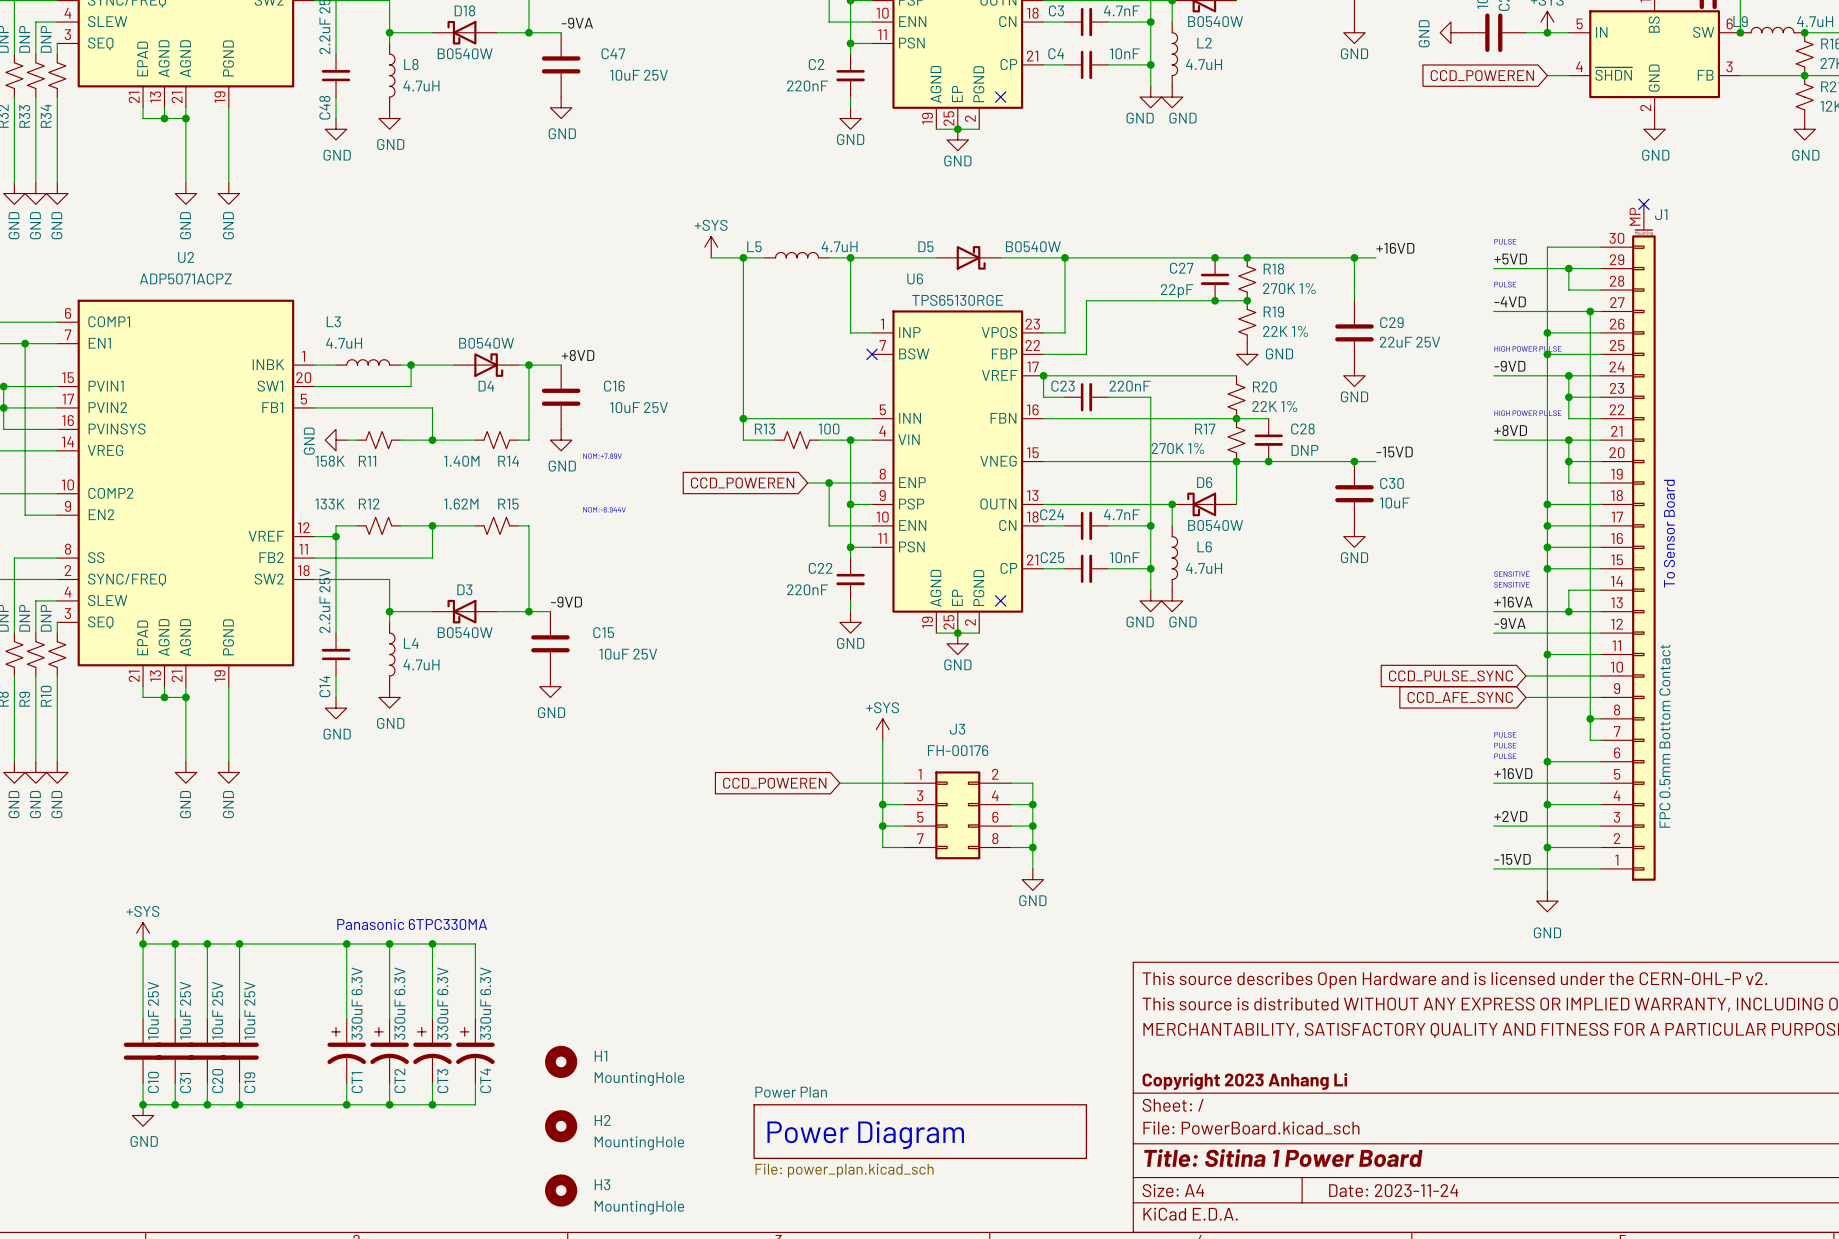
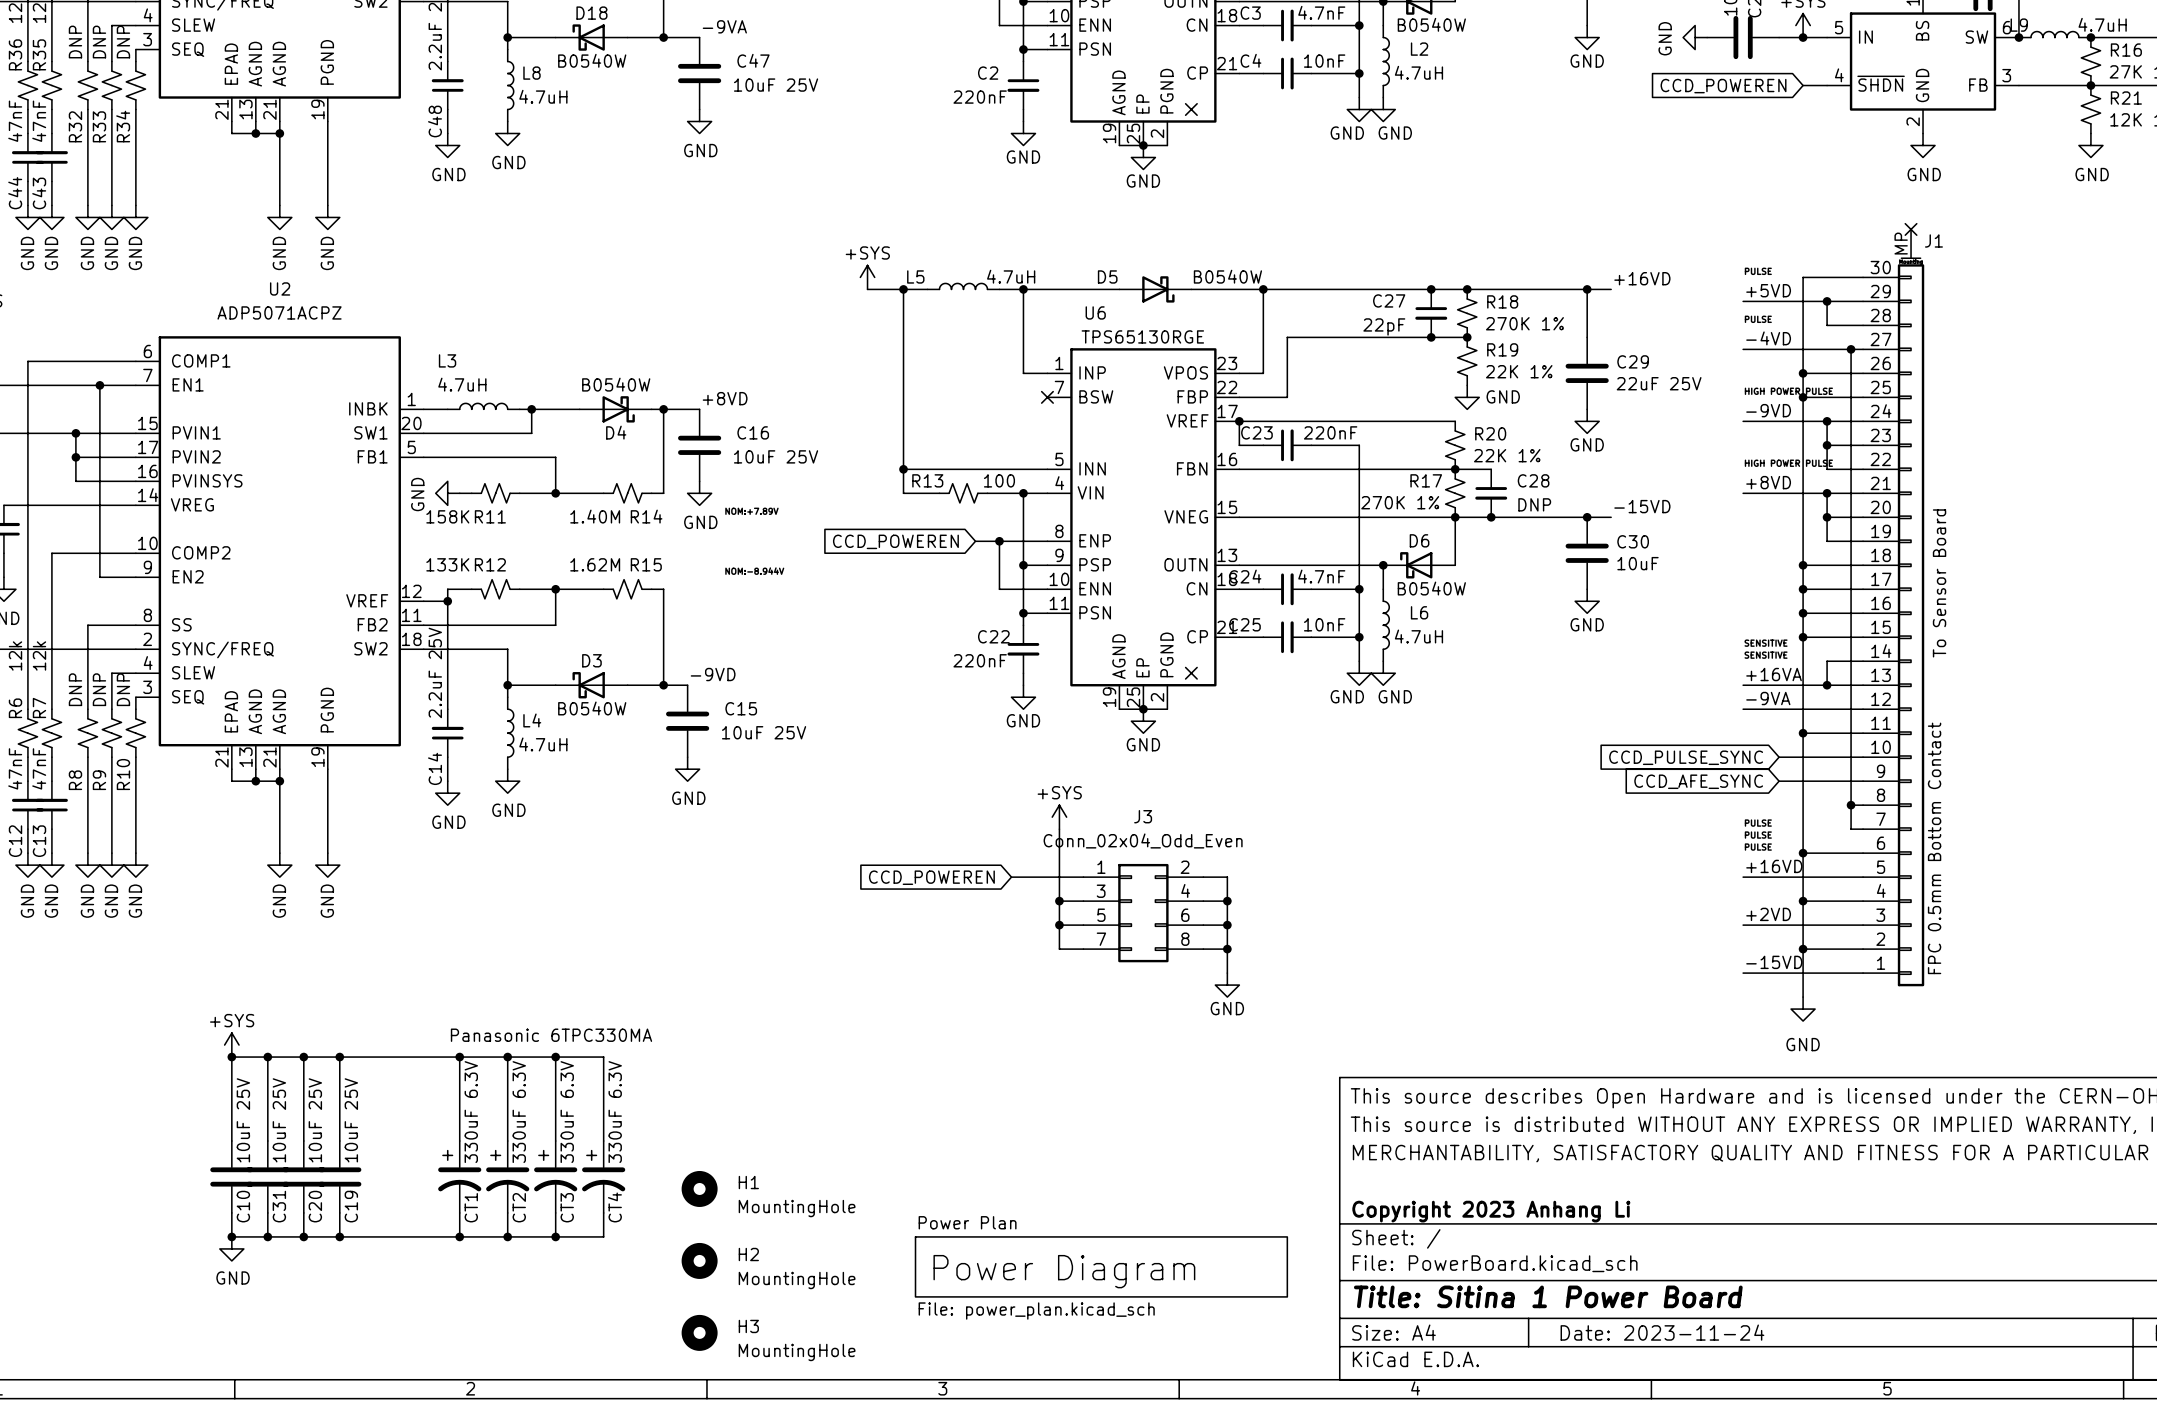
J3 value: FH-00176 (958, 750) -> Conn_02x04_Odd_Even (1143, 840)

